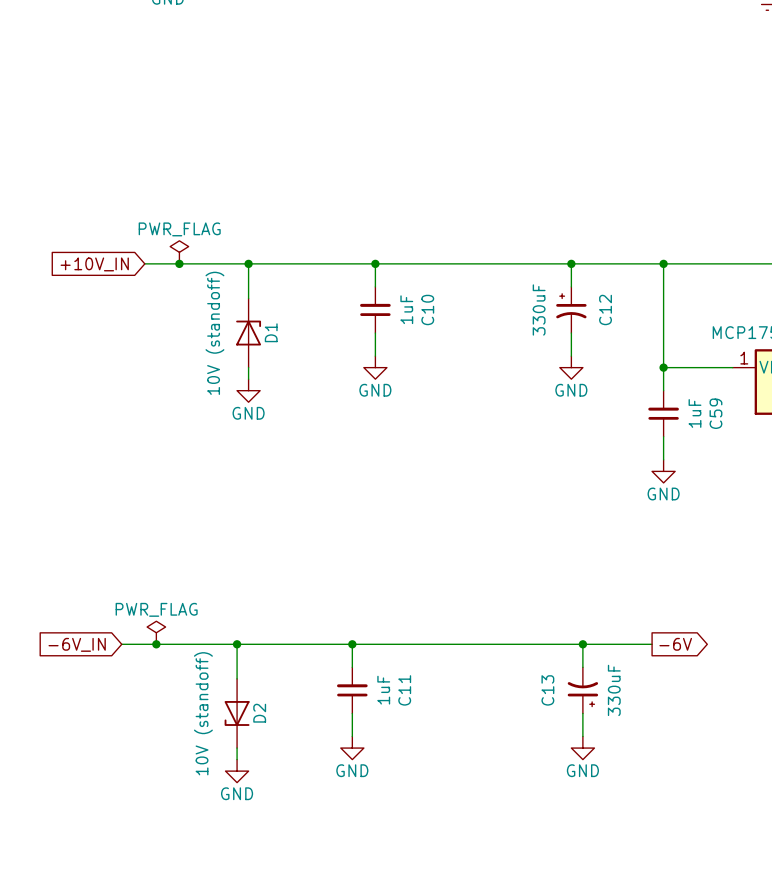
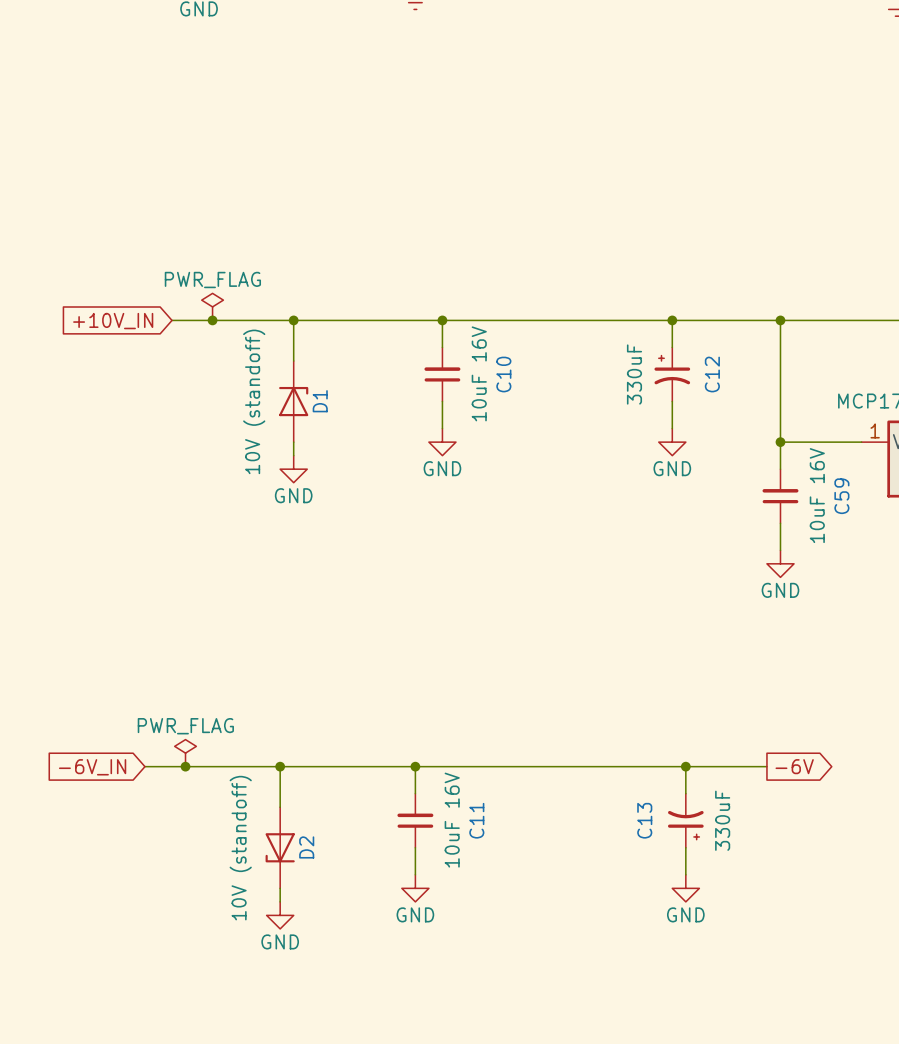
C10 value: 1uF (406, 309) -> 10uF 16V (479, 373)
C59 value: 1uF (694, 413) -> 10uF 16V (817, 495)
C11 value: 1uF (383, 690) -> 10uF 16V (452, 820)

